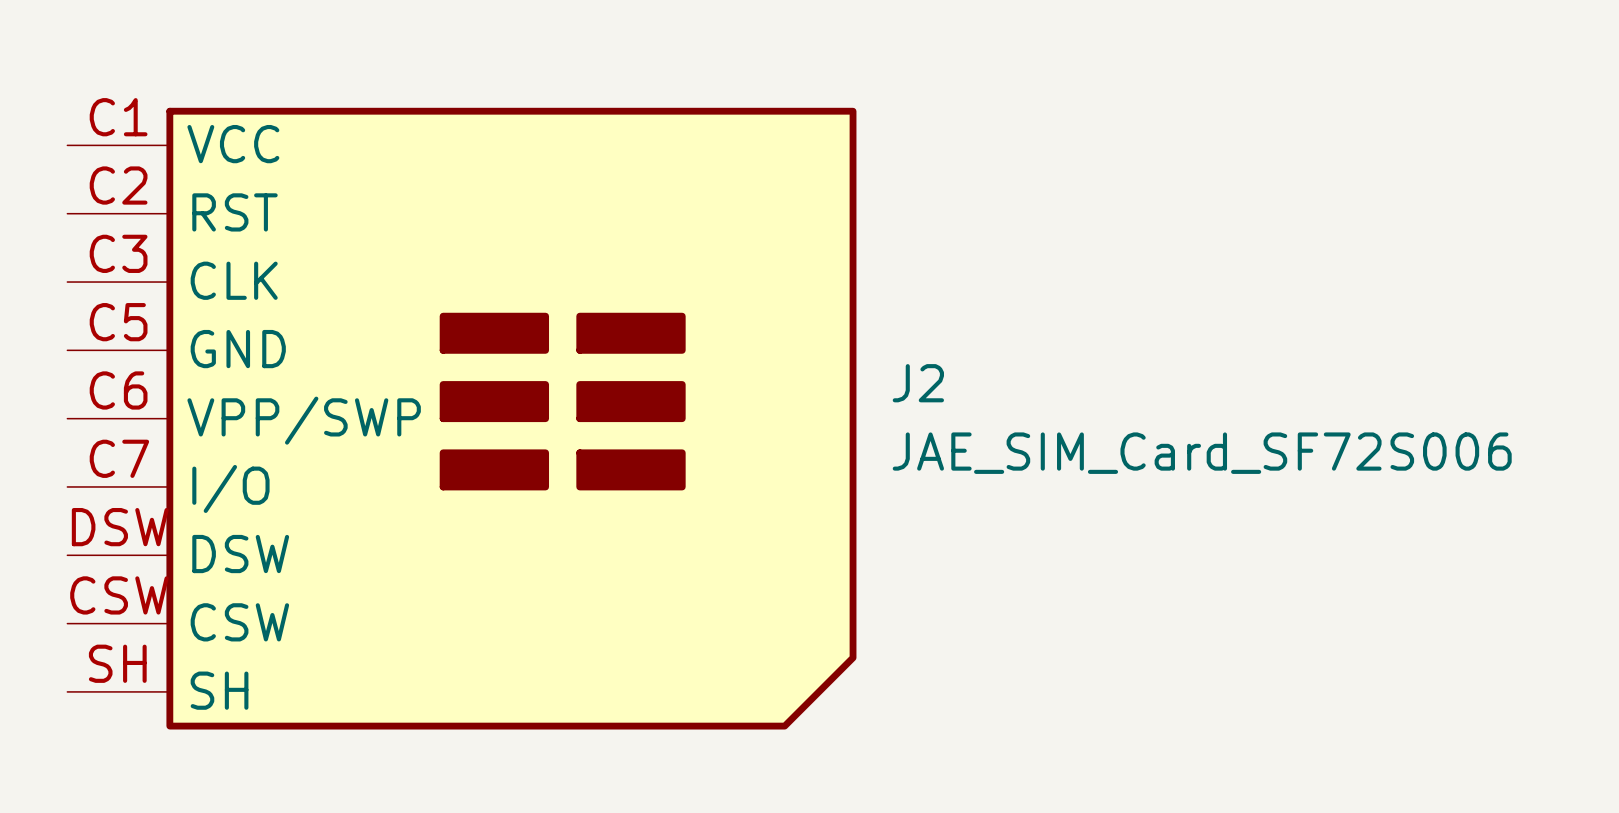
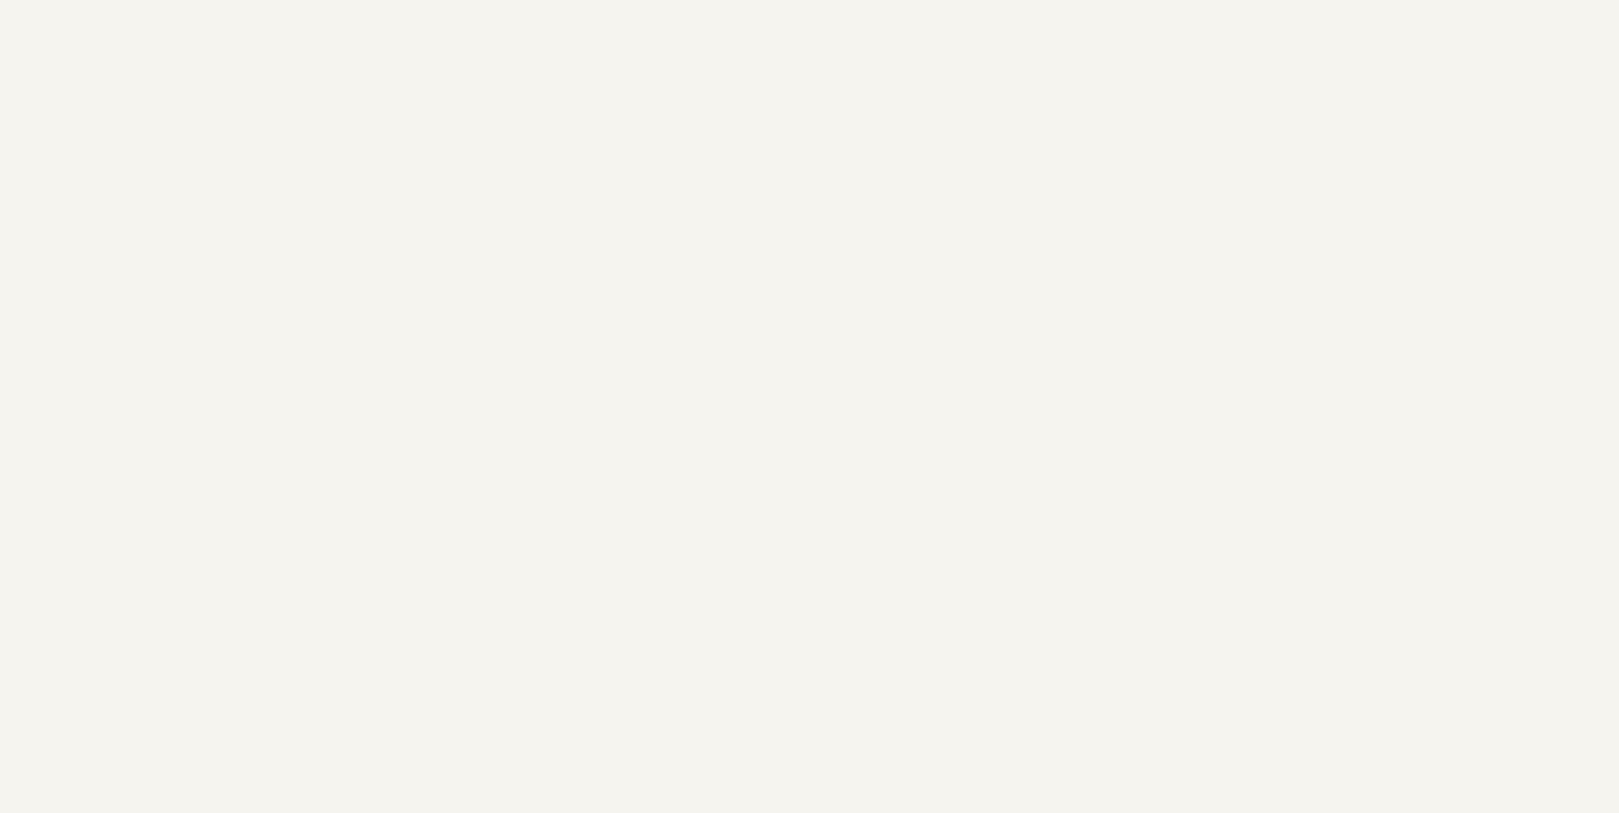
J2: JAE_SIM_Card_SF72S006 (461, 418) -> none

